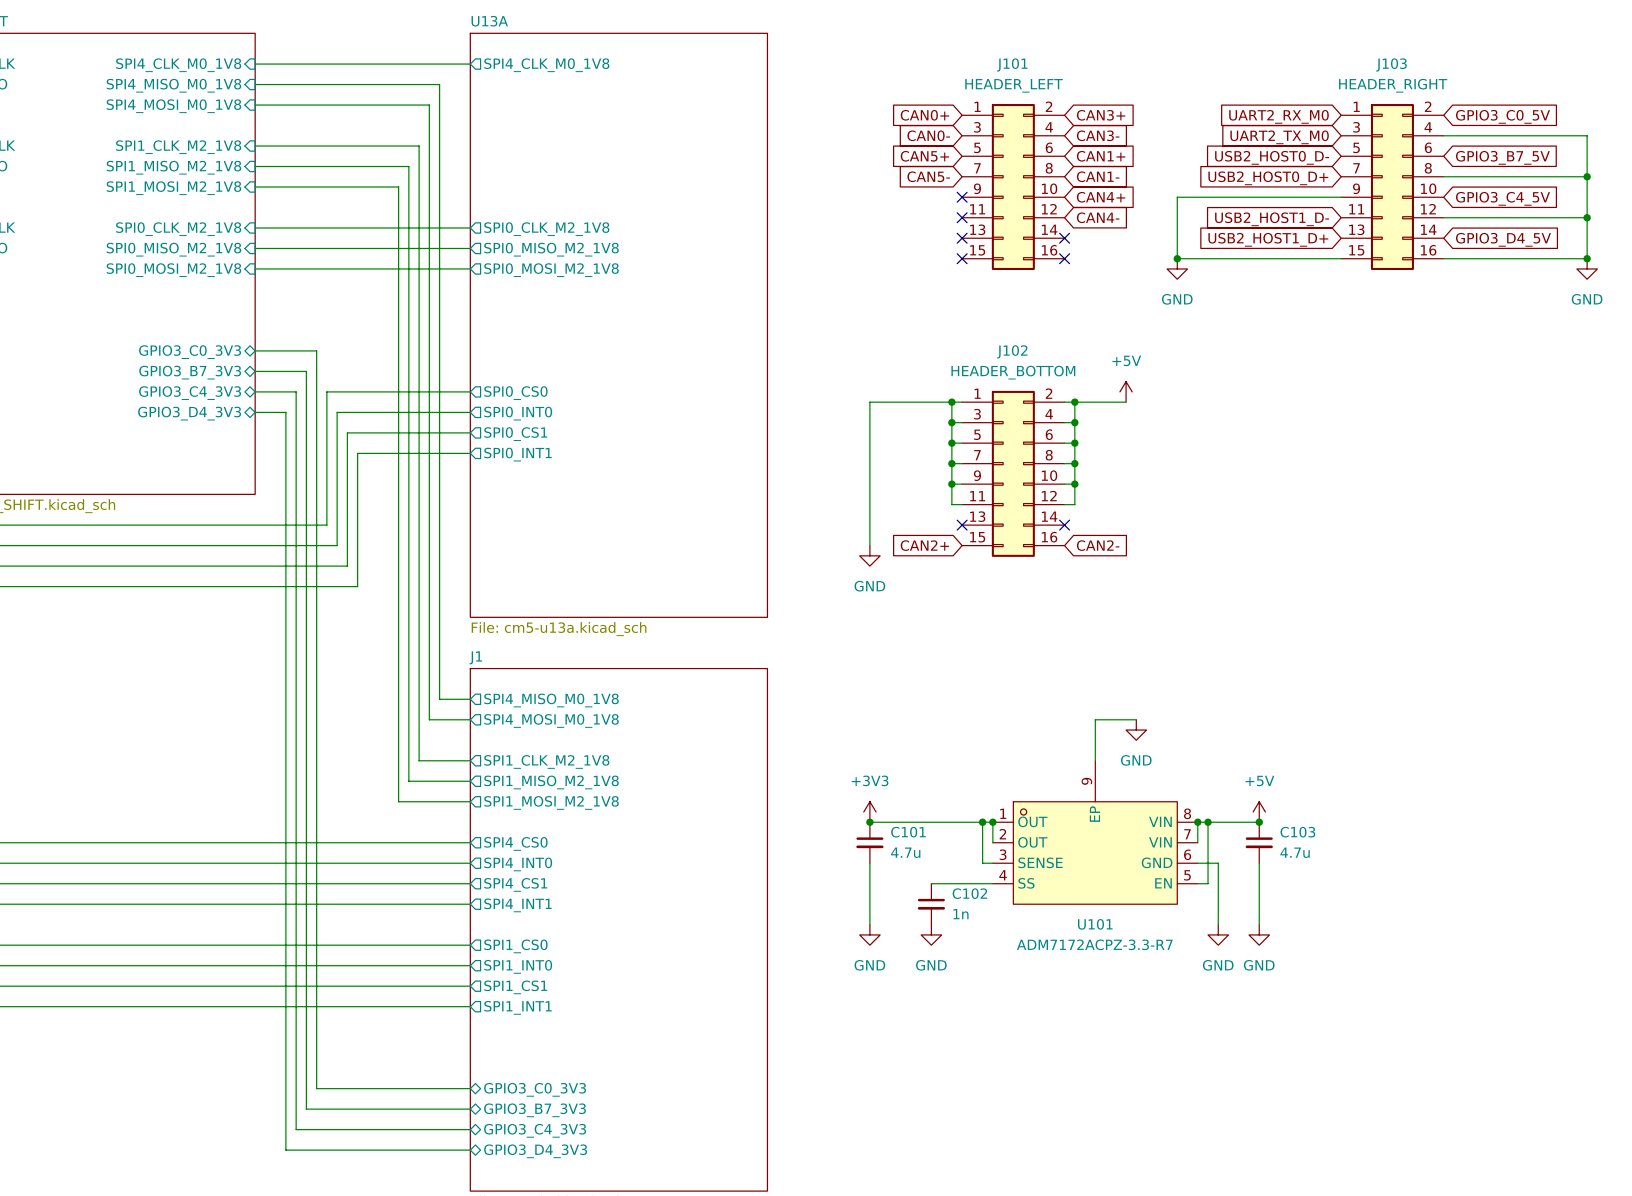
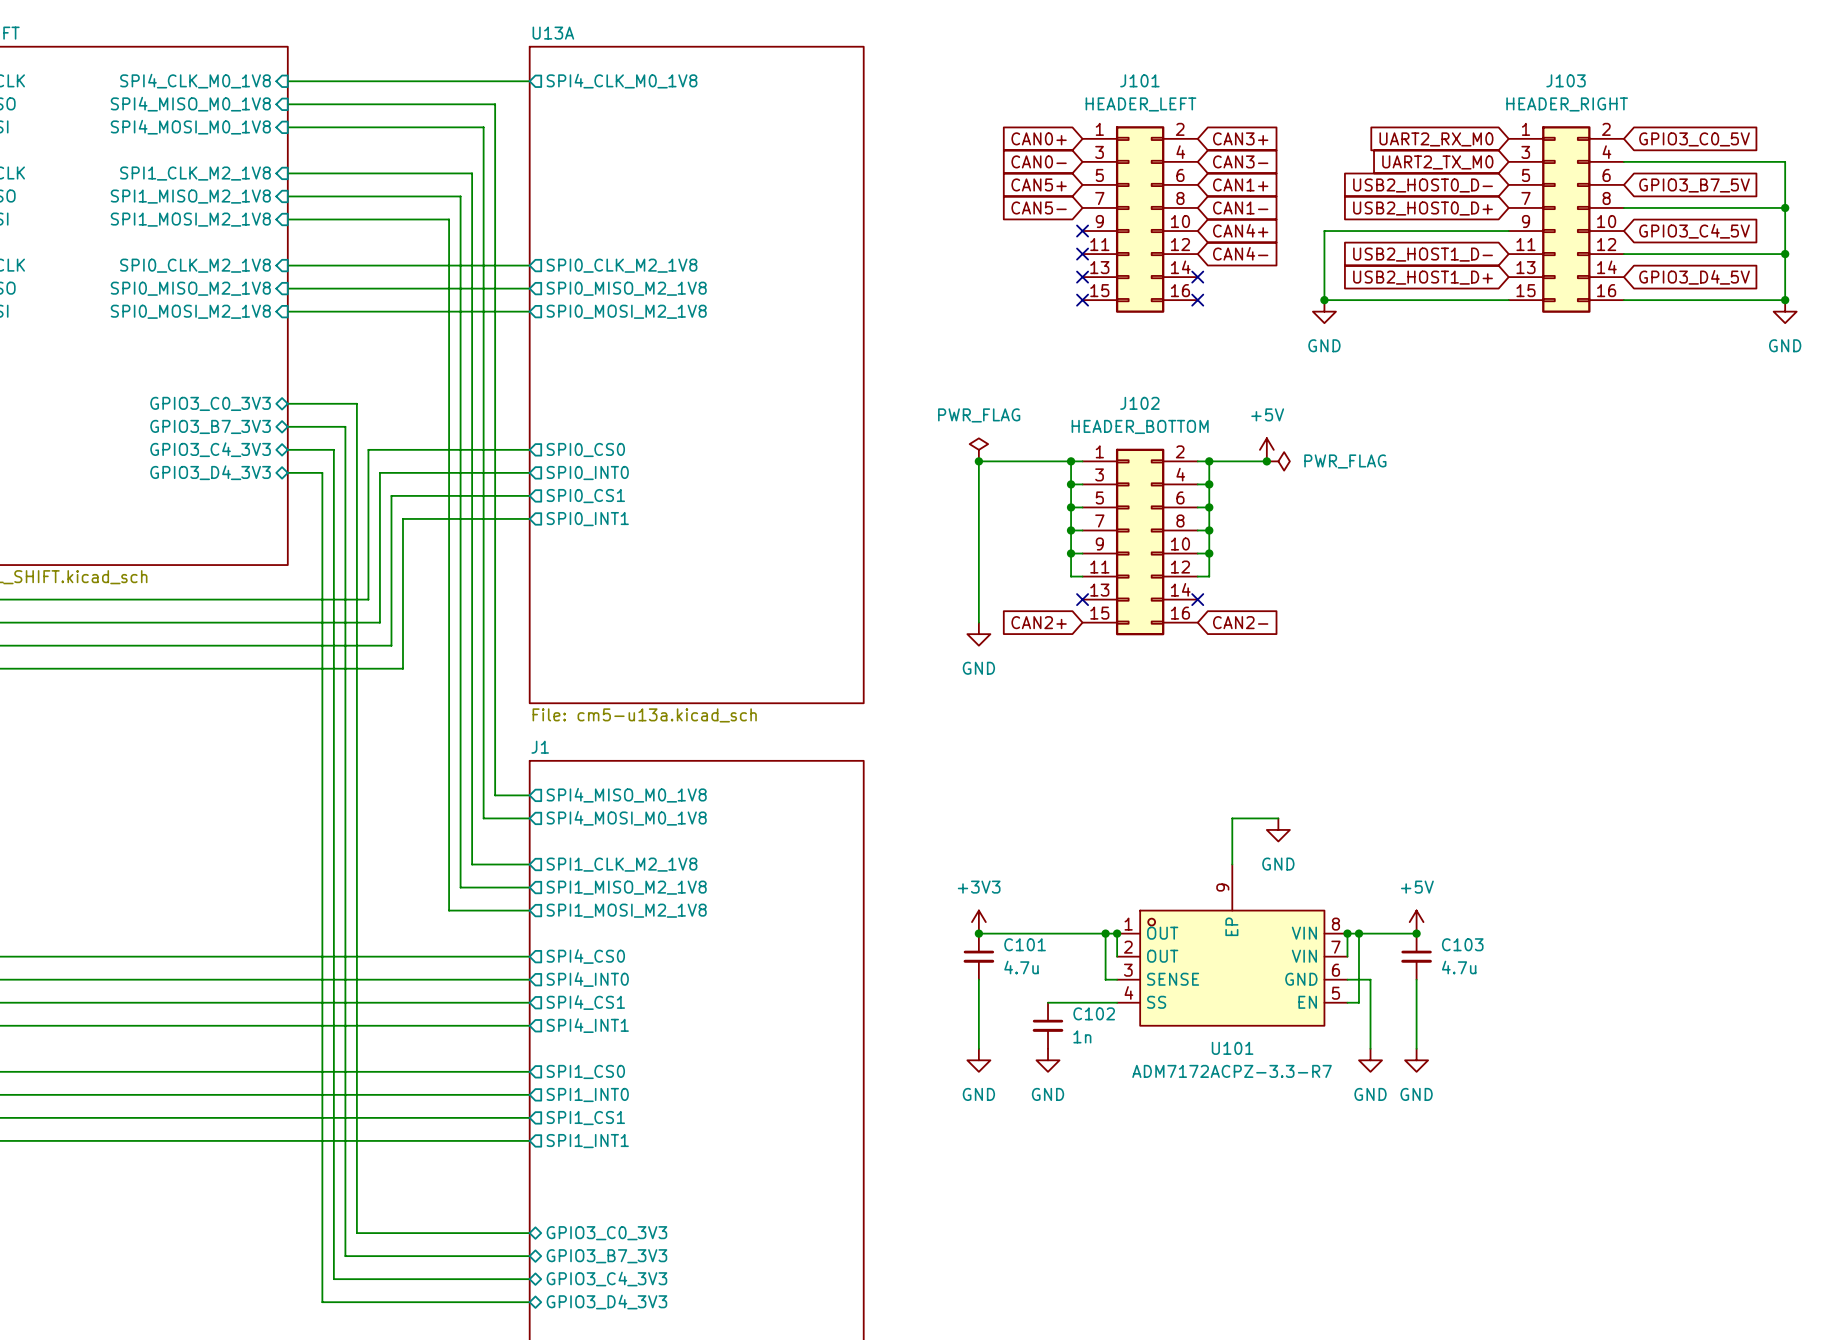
power symbol: none -> PWR_FLAG (978, 449)
junction: none -> (978, 461)
junction: none -> (1266, 461)
power symbol: none -> PWR_FLAG (1278, 461)

